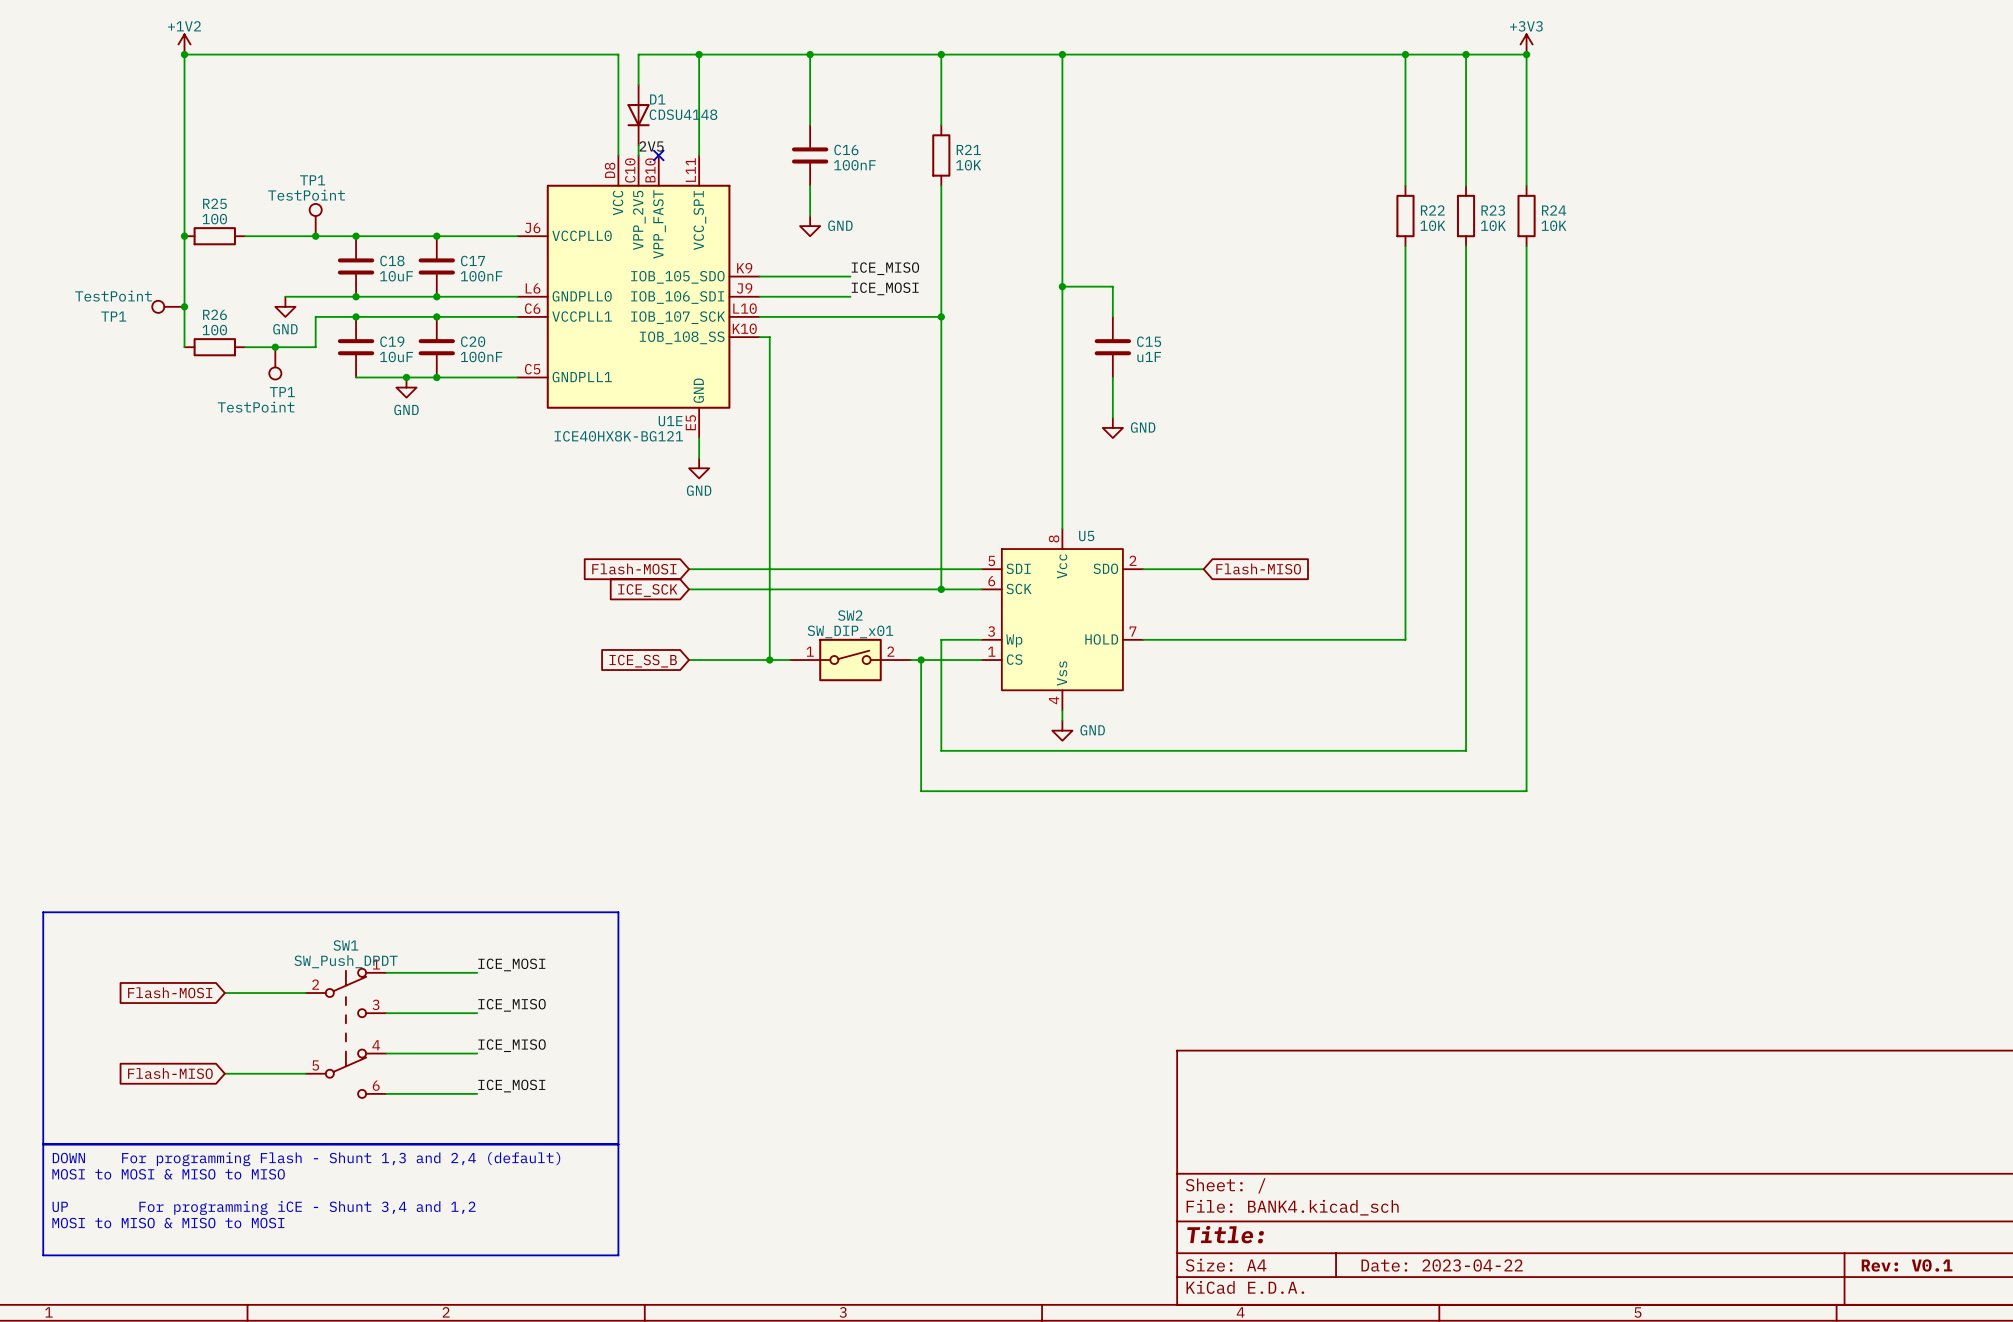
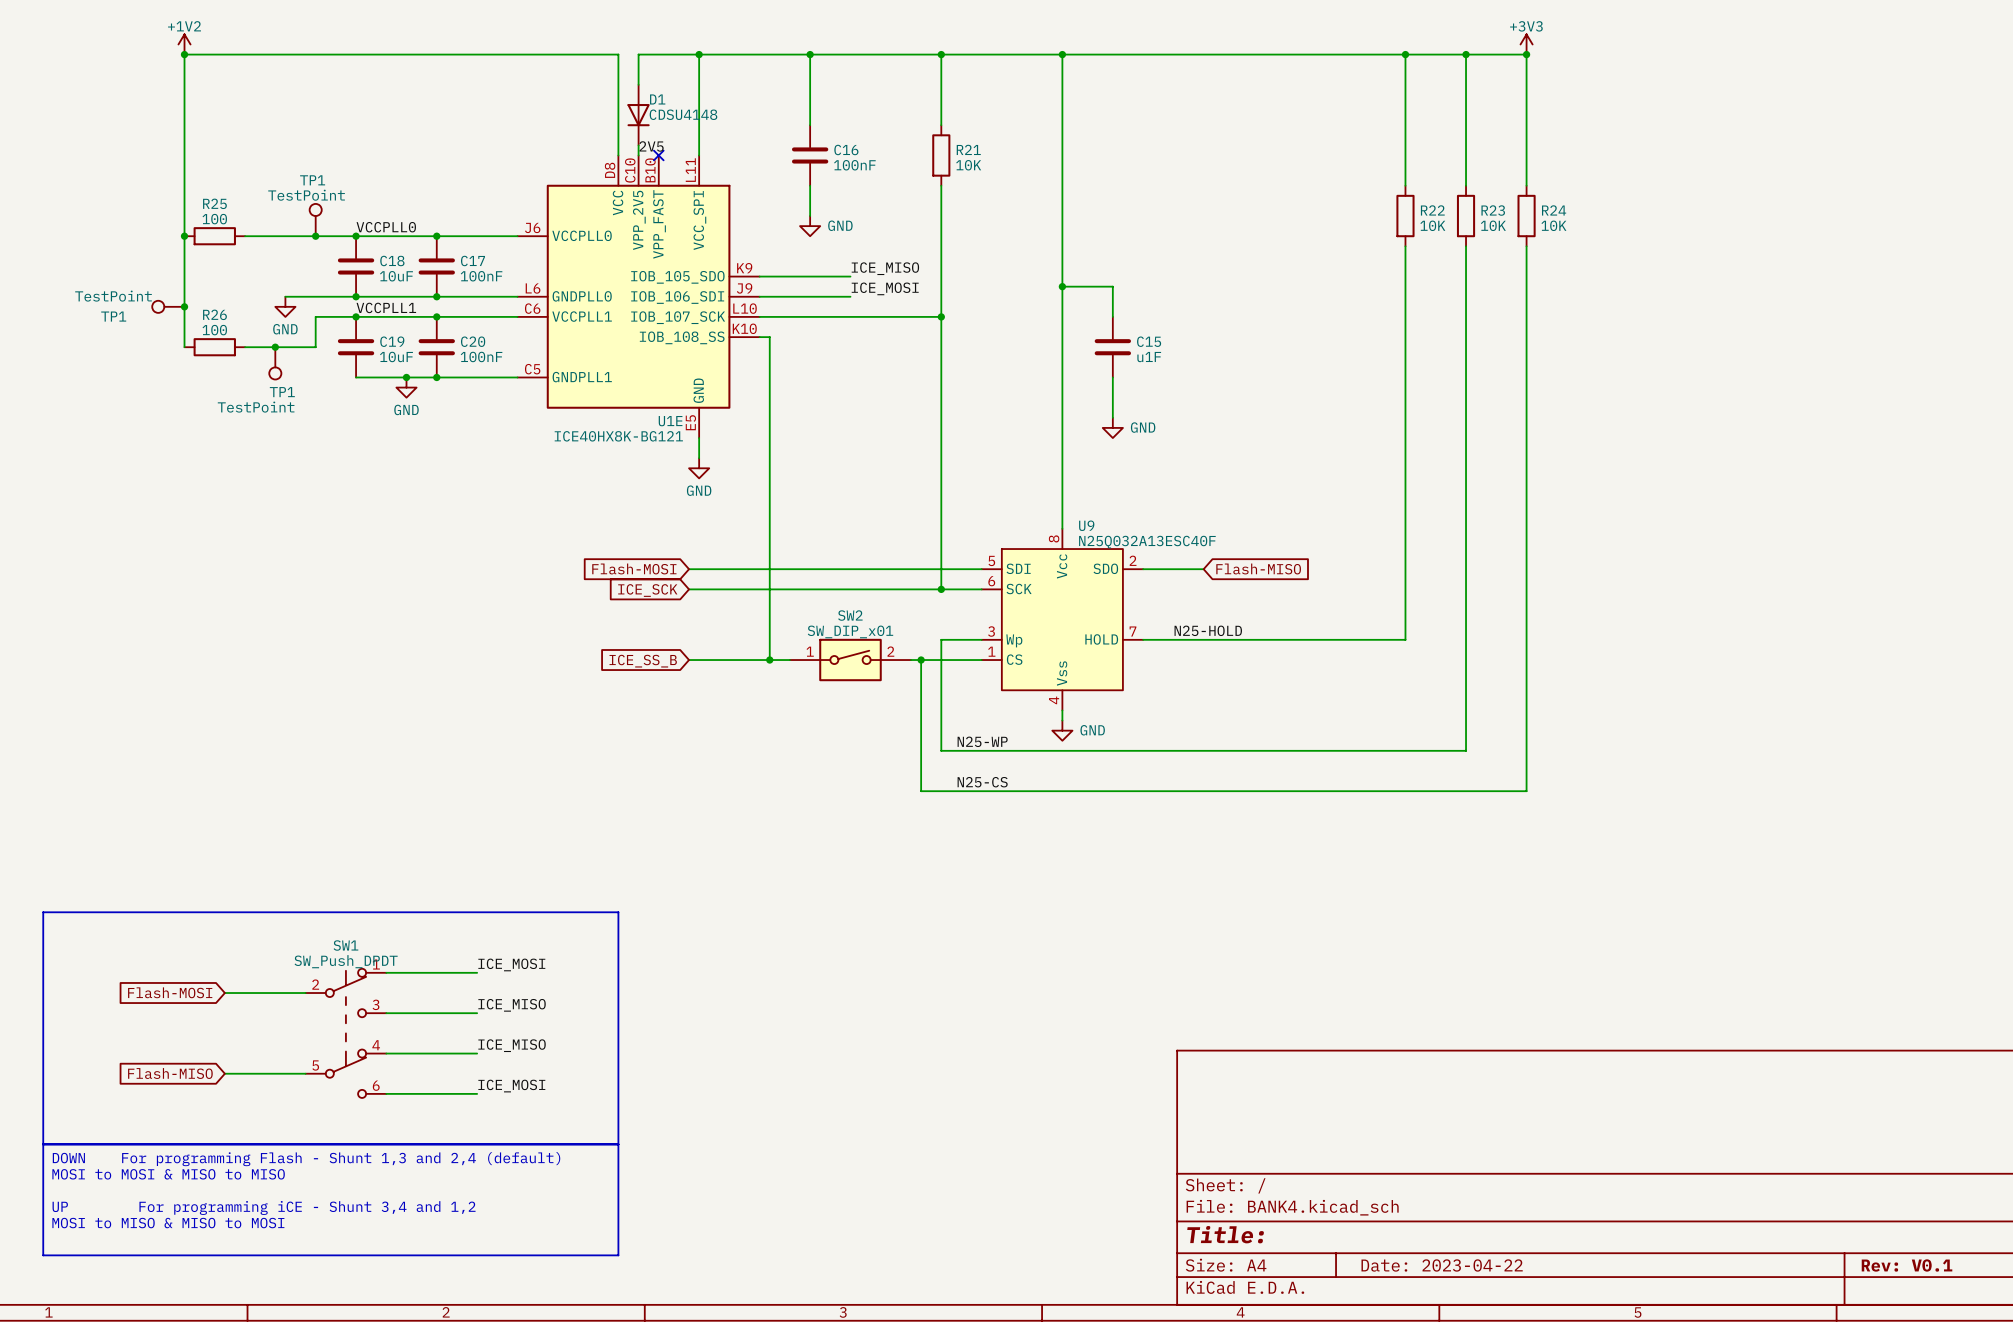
label: none -> VCCPLL0 (386, 227)
label: none -> VCCPLL1 (386, 307)
U5 name: U5 (1086, 536) -> U9 (1086, 525)
U5 value: none -> N25Q032A13ESC40F (1147, 542)
label: none -> N25-HOLD (1208, 630)
label: none -> N25-WP (982, 741)
label: none -> N25-CS (982, 782)

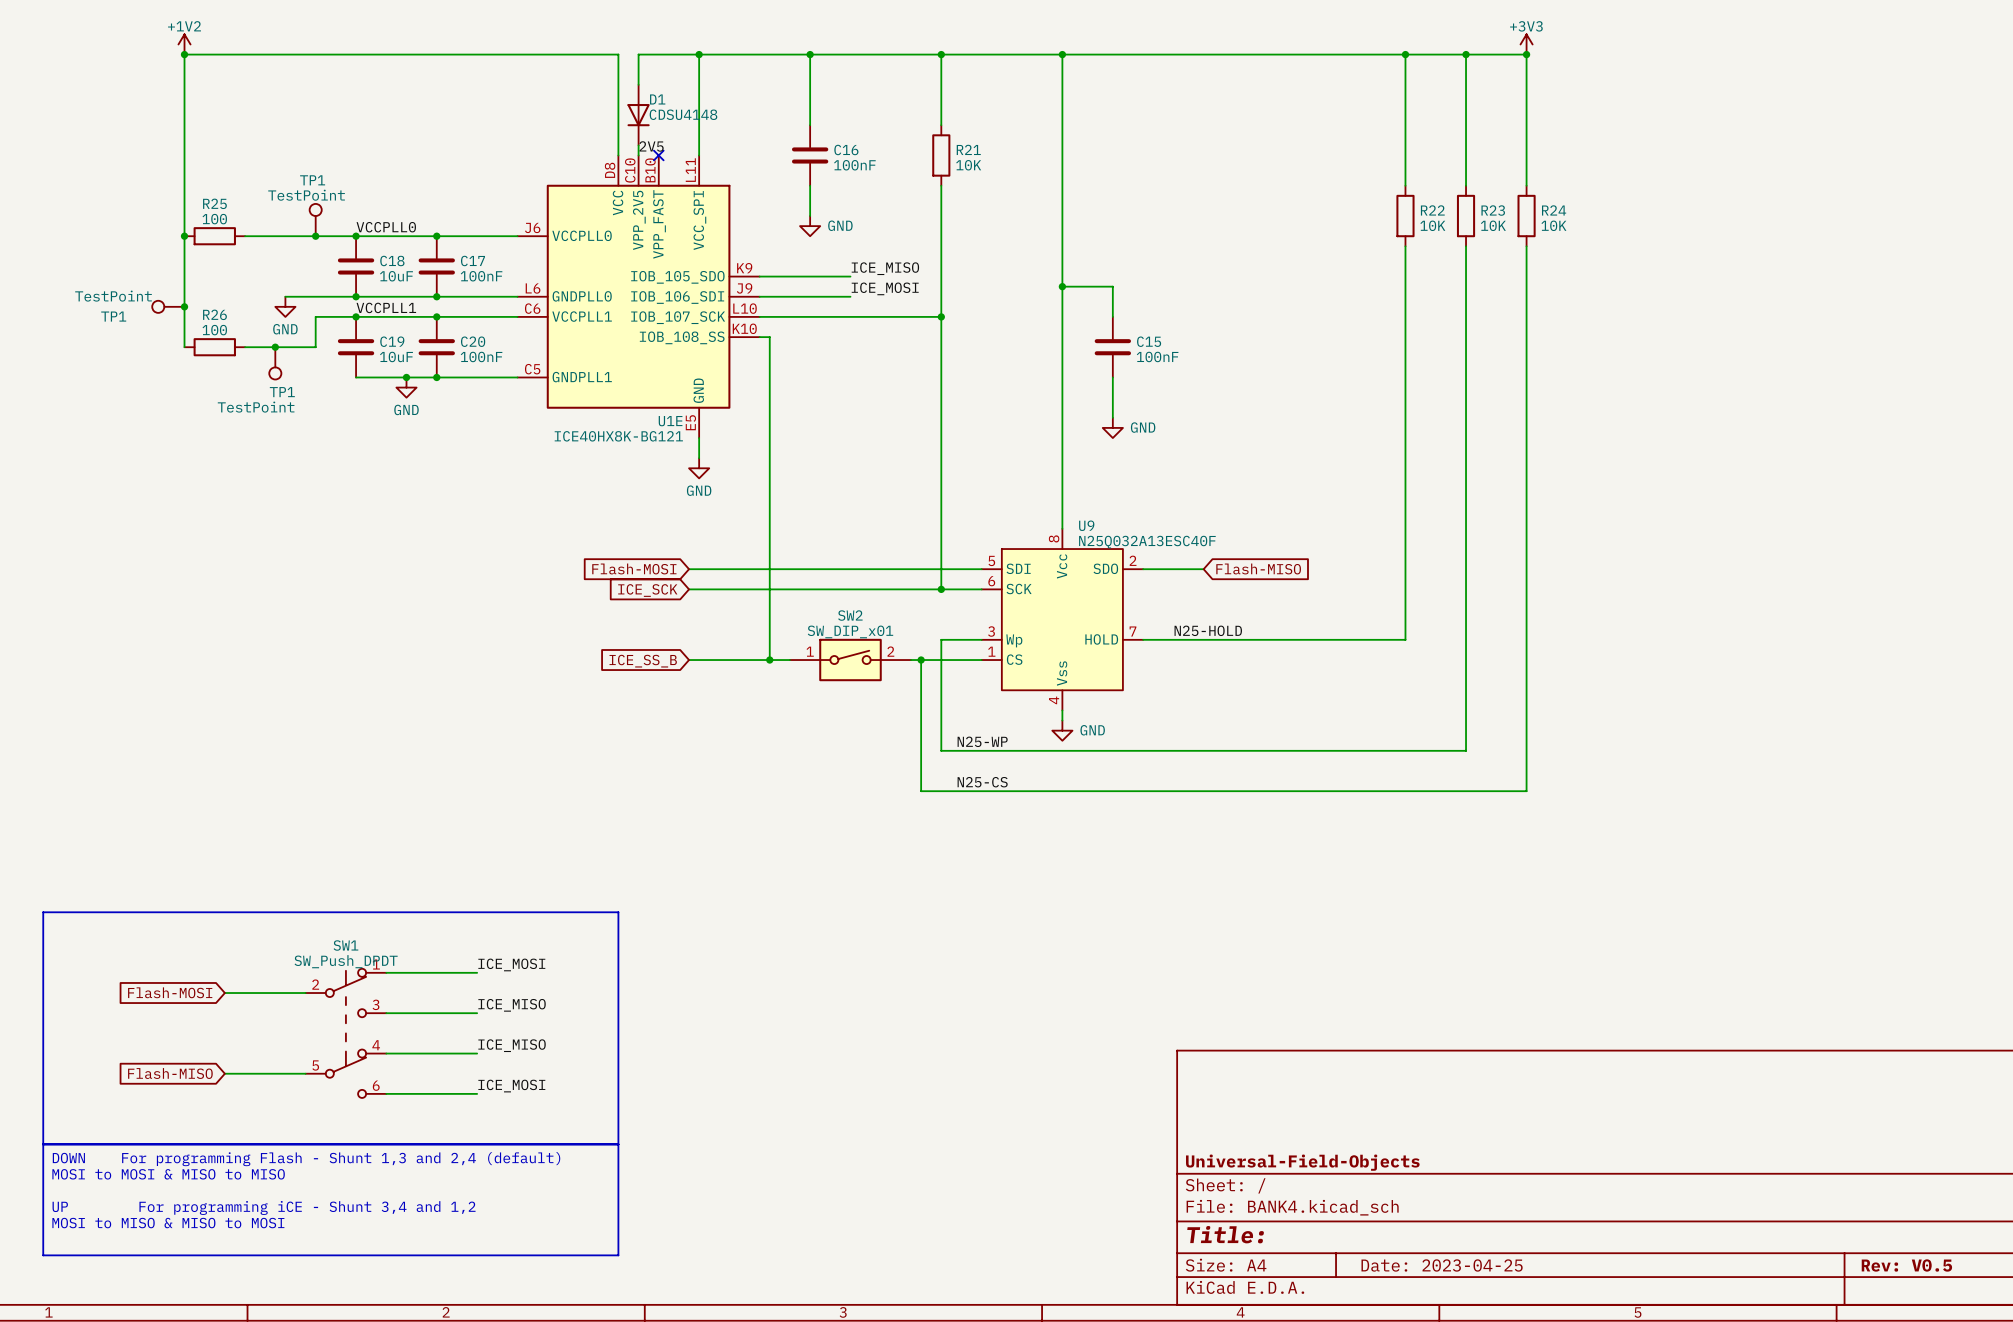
C15 value: u1F (1149, 357) -> 100nF (1157, 356)
title block: none -> Universal-Field-Objects (1302, 1162)
title block: Date: 2023-04-22 (1442, 1265) -> Date: 2023-04-25 (1442, 1265)
title block: Rev: V0.1 (1907, 1265) -> Rev: V0.5 (1906, 1265)

